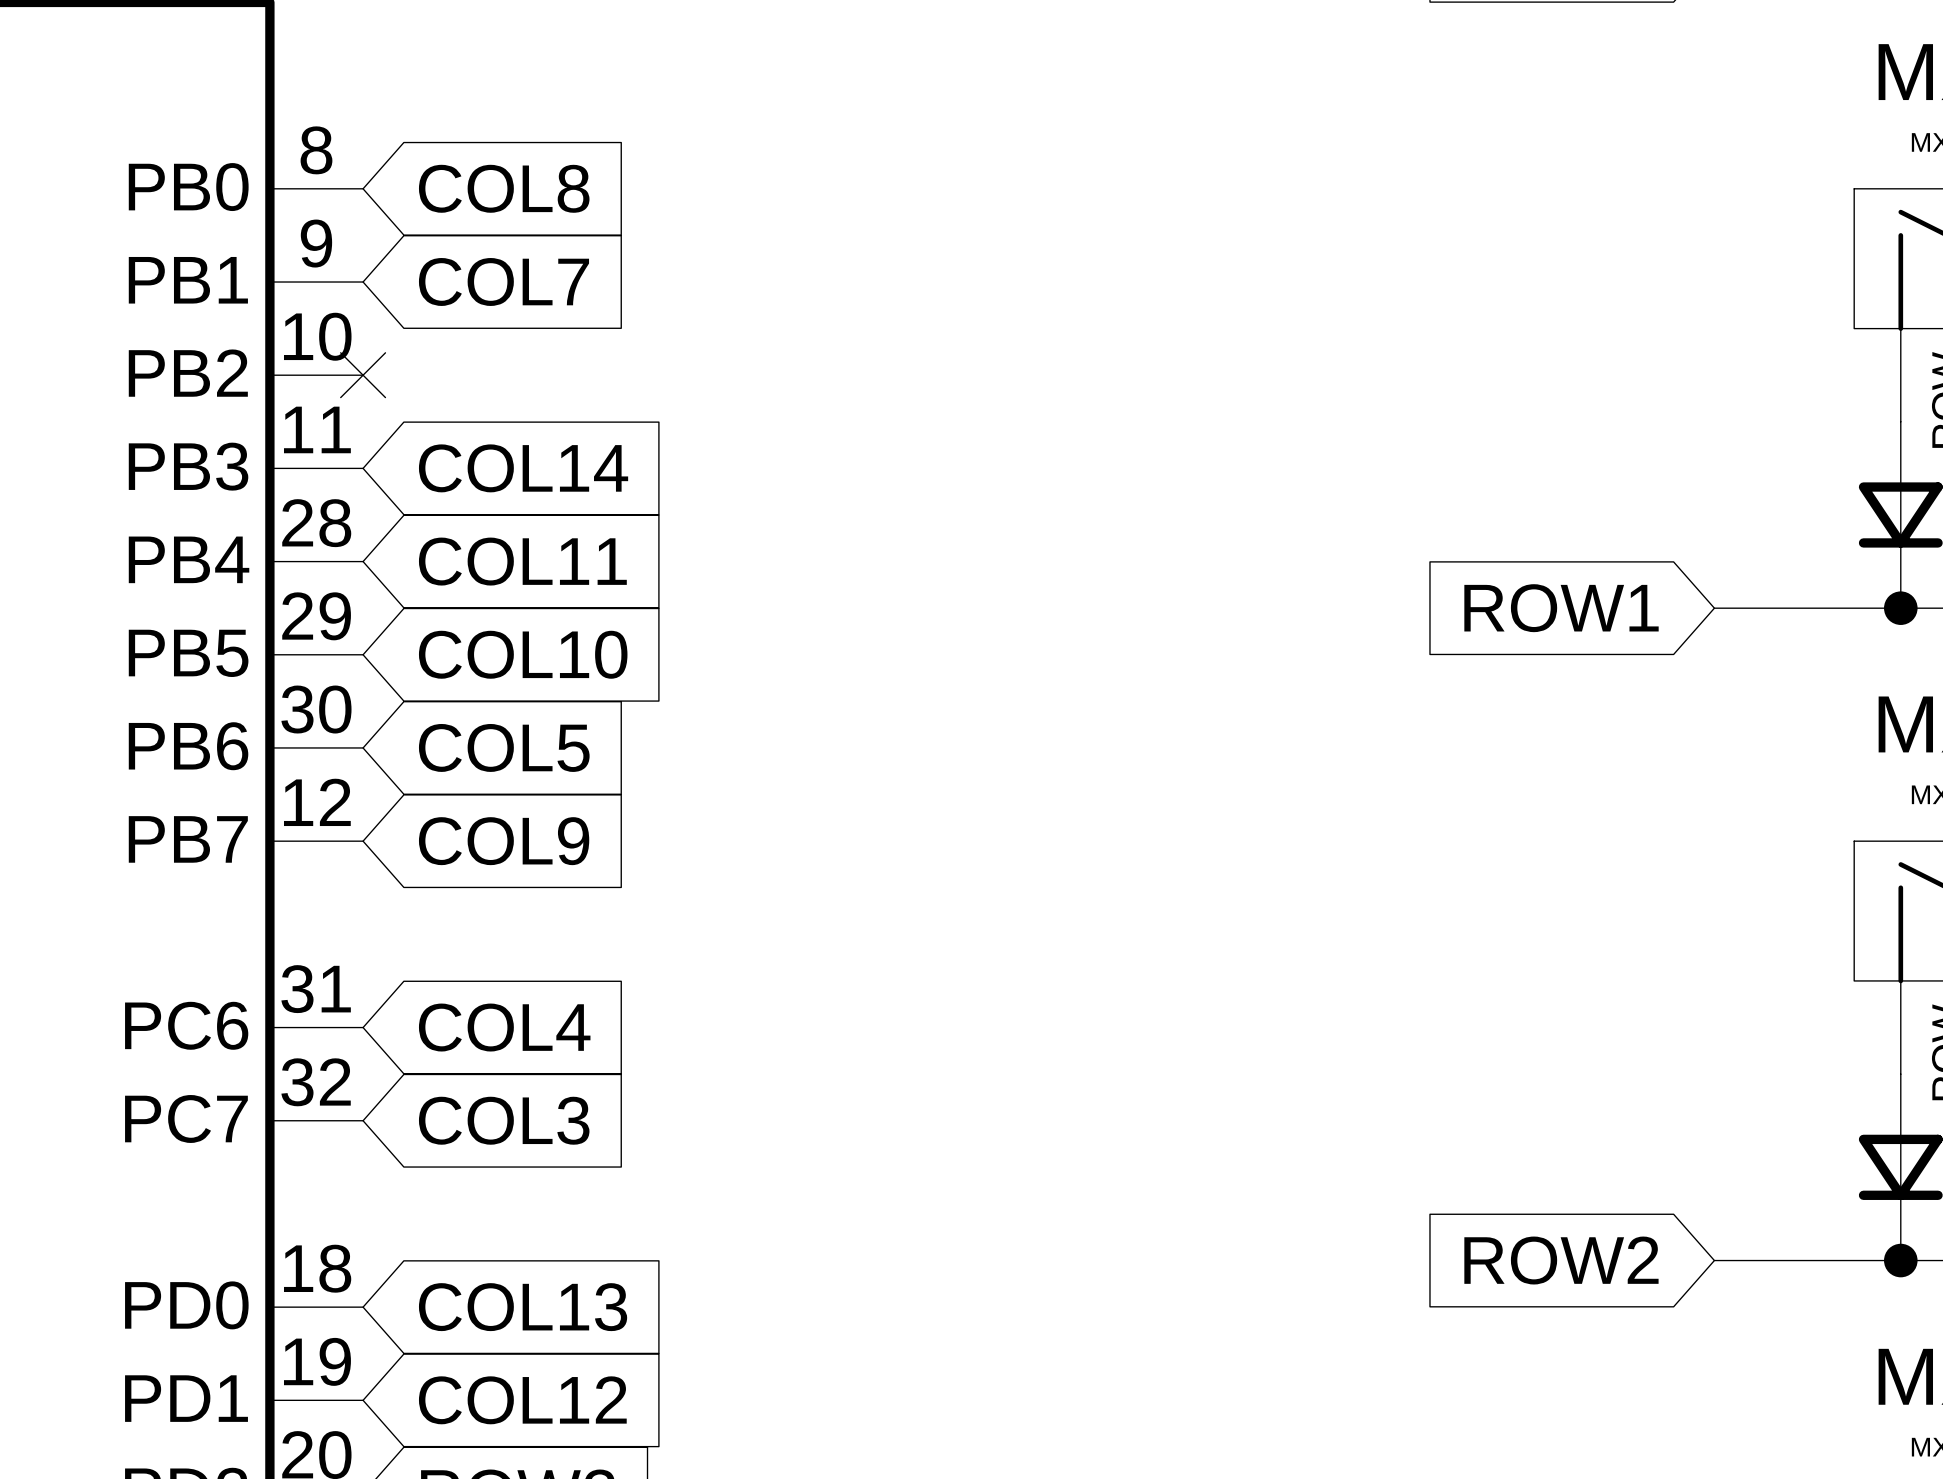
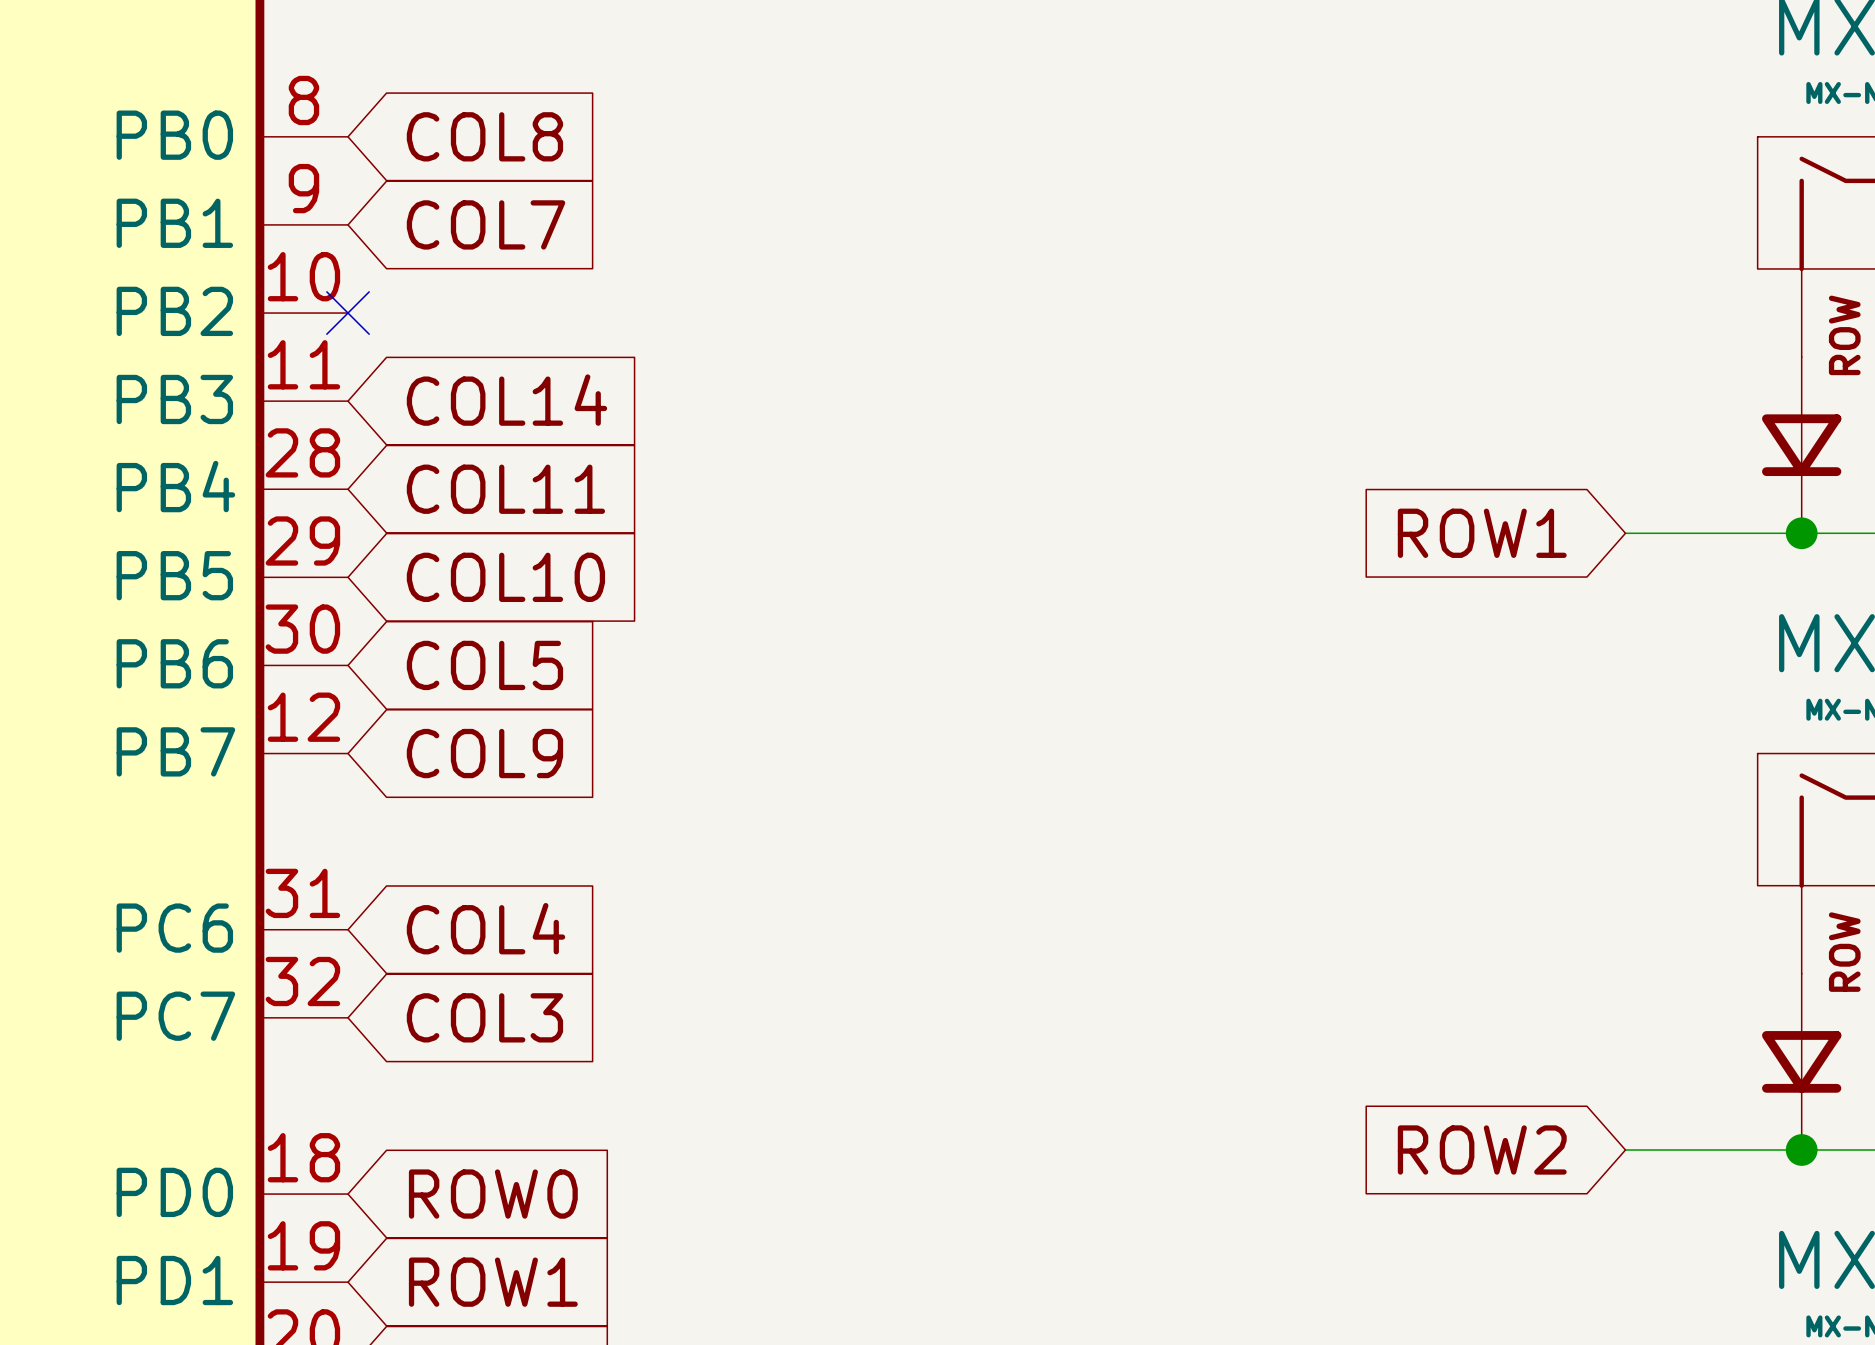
global label: COL13 (523, 1307) -> ROW0 (493, 1194)
global label: COL12 (522, 1400) -> ROW1 (493, 1282)

